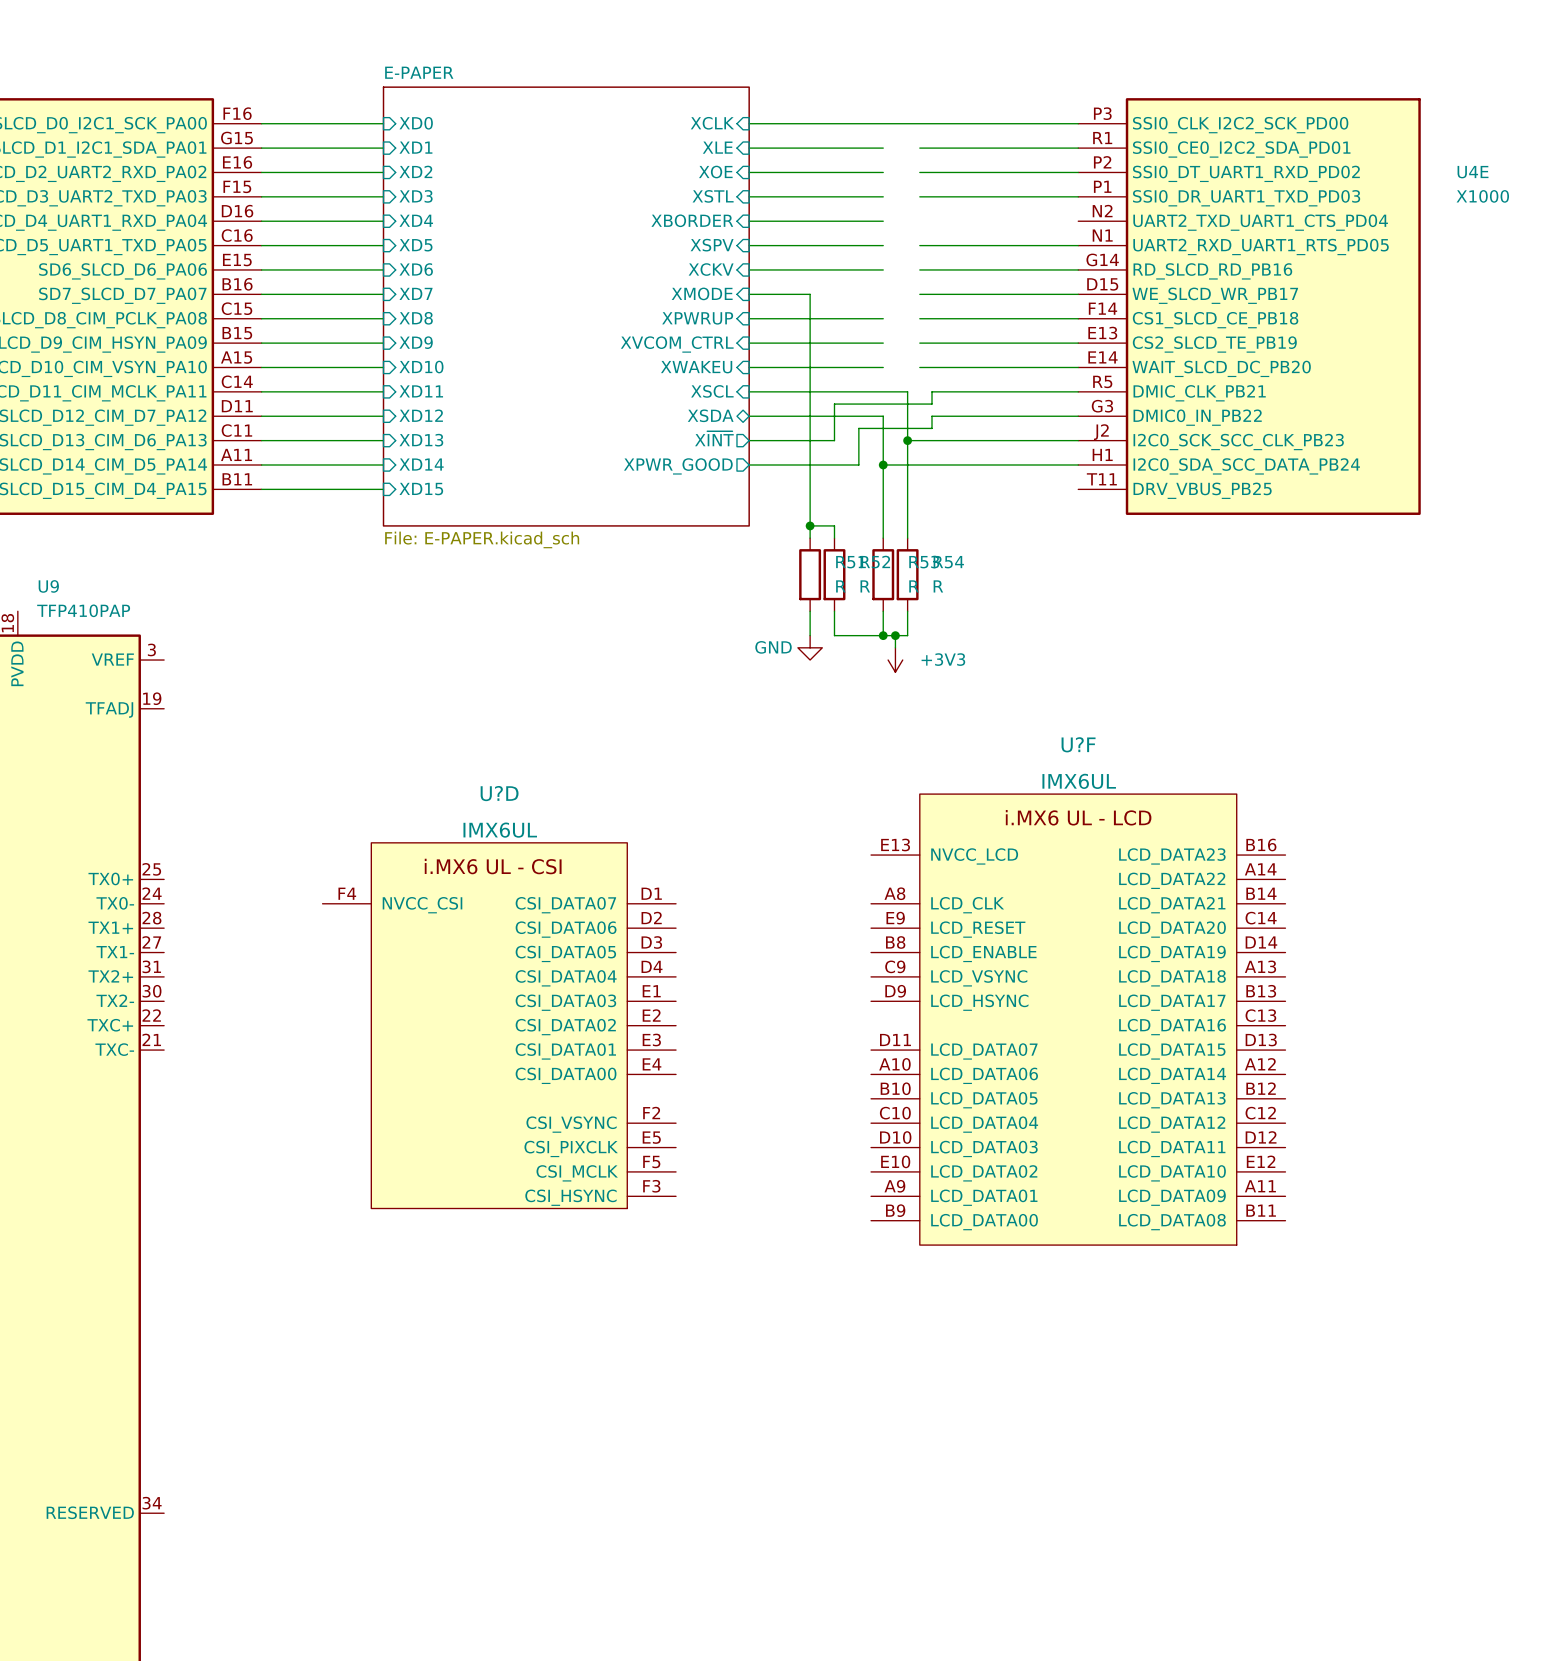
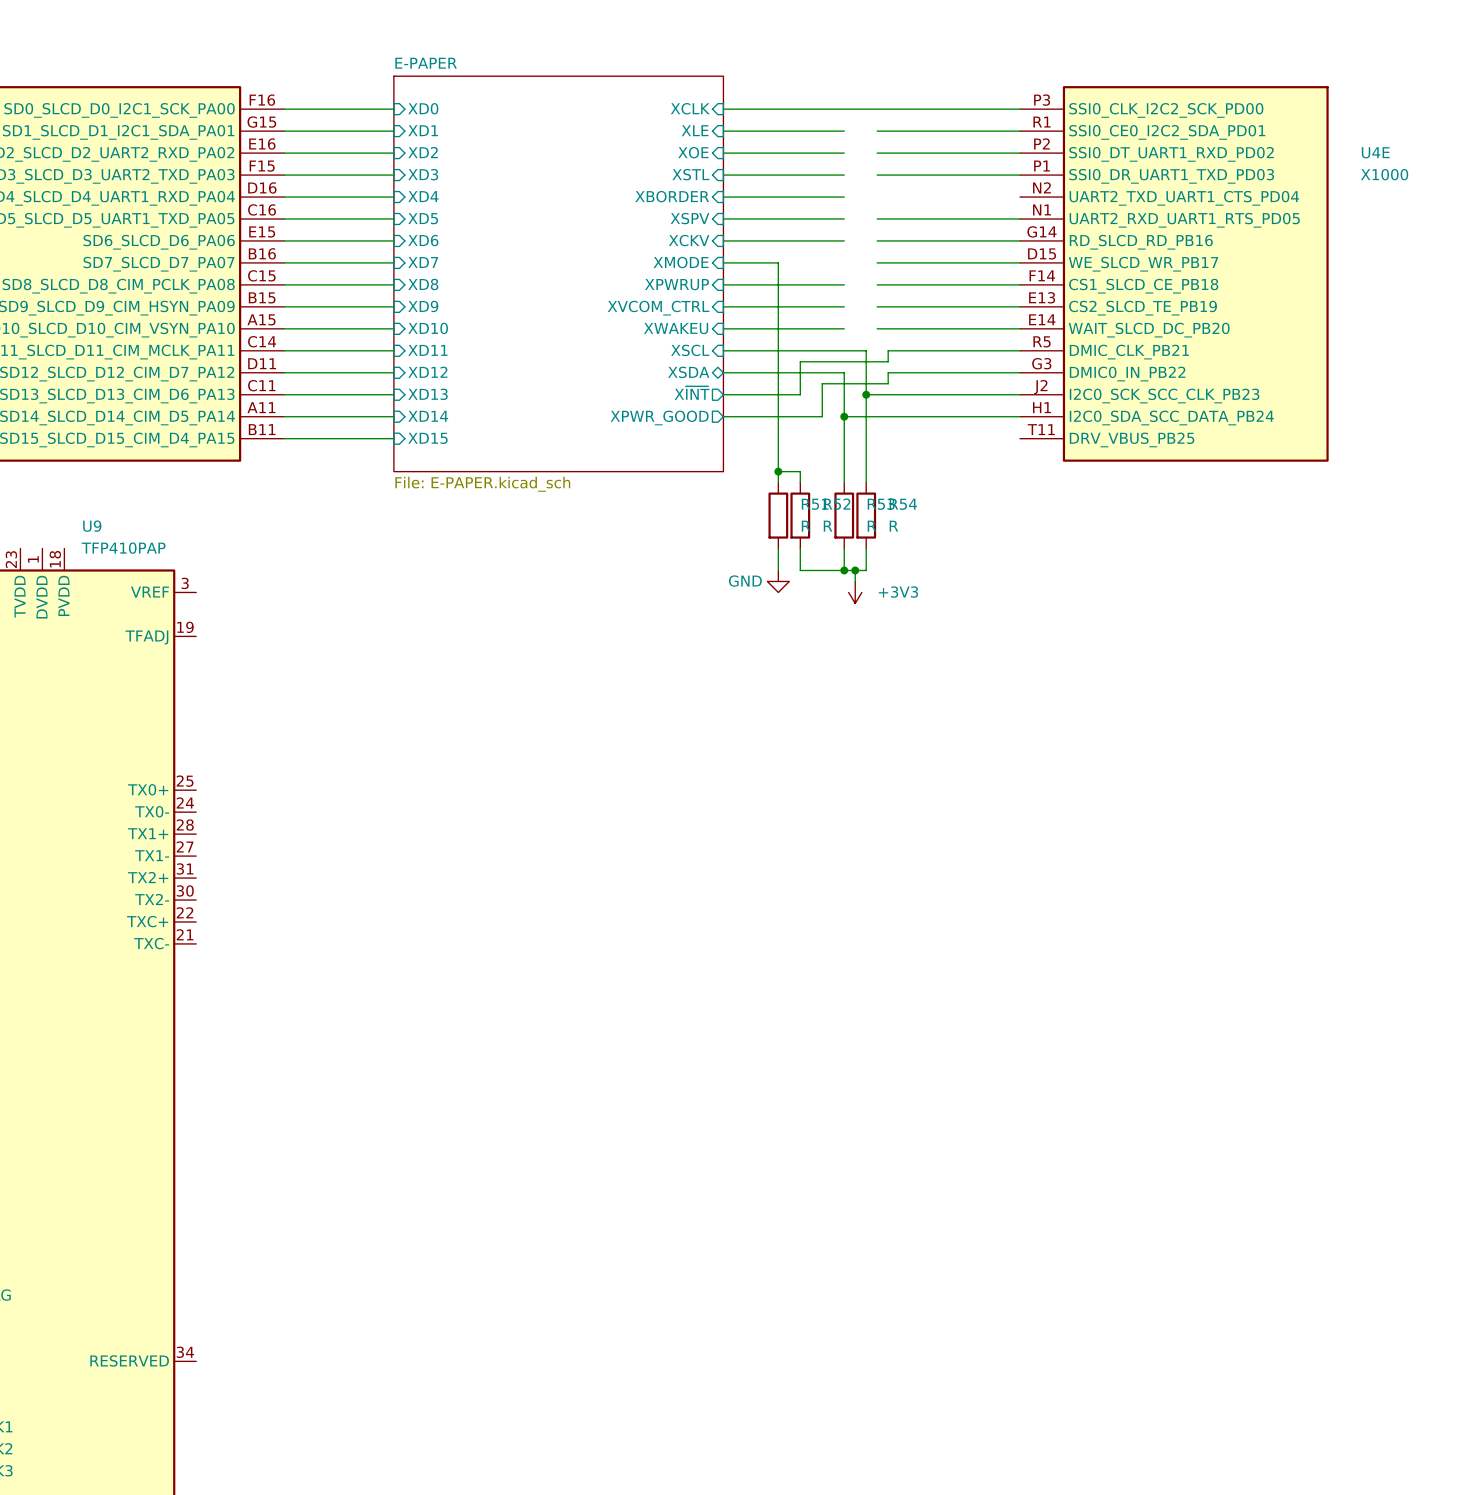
U?F: IMX6UL (1078, 1019) -> none
U?D: IMX6UL (499, 1025) -> none

